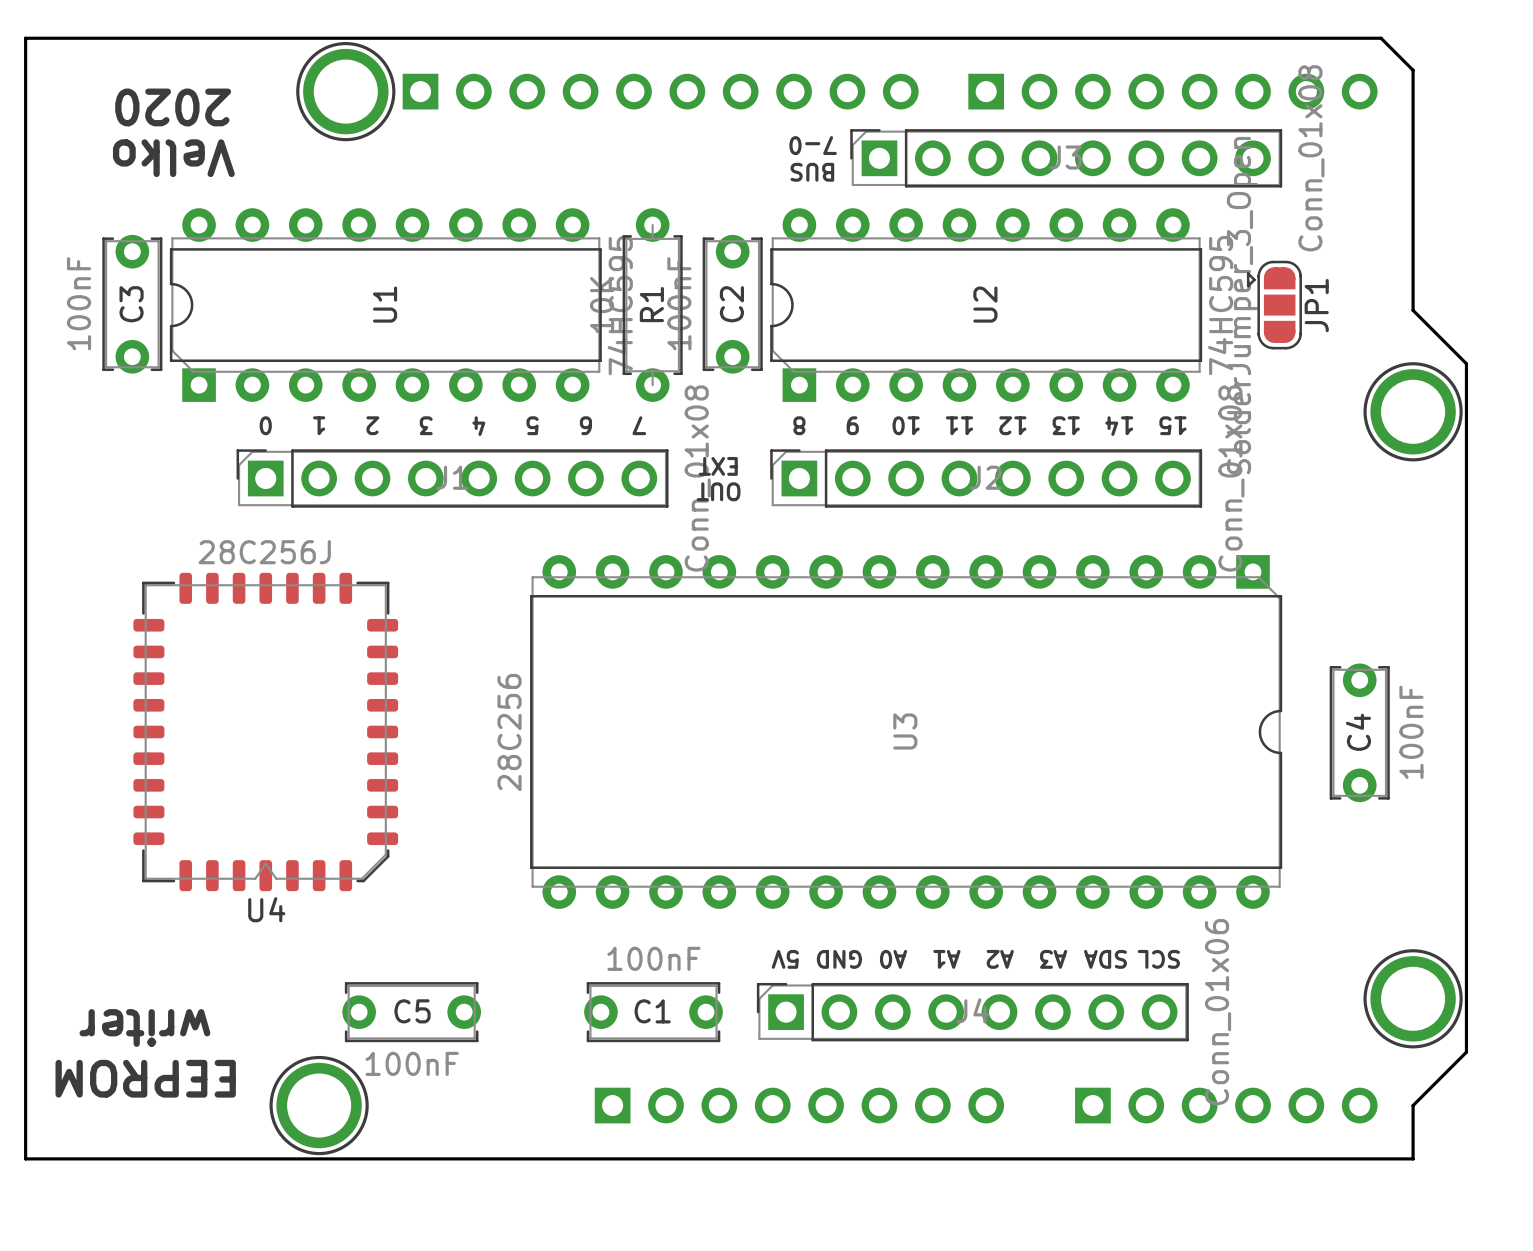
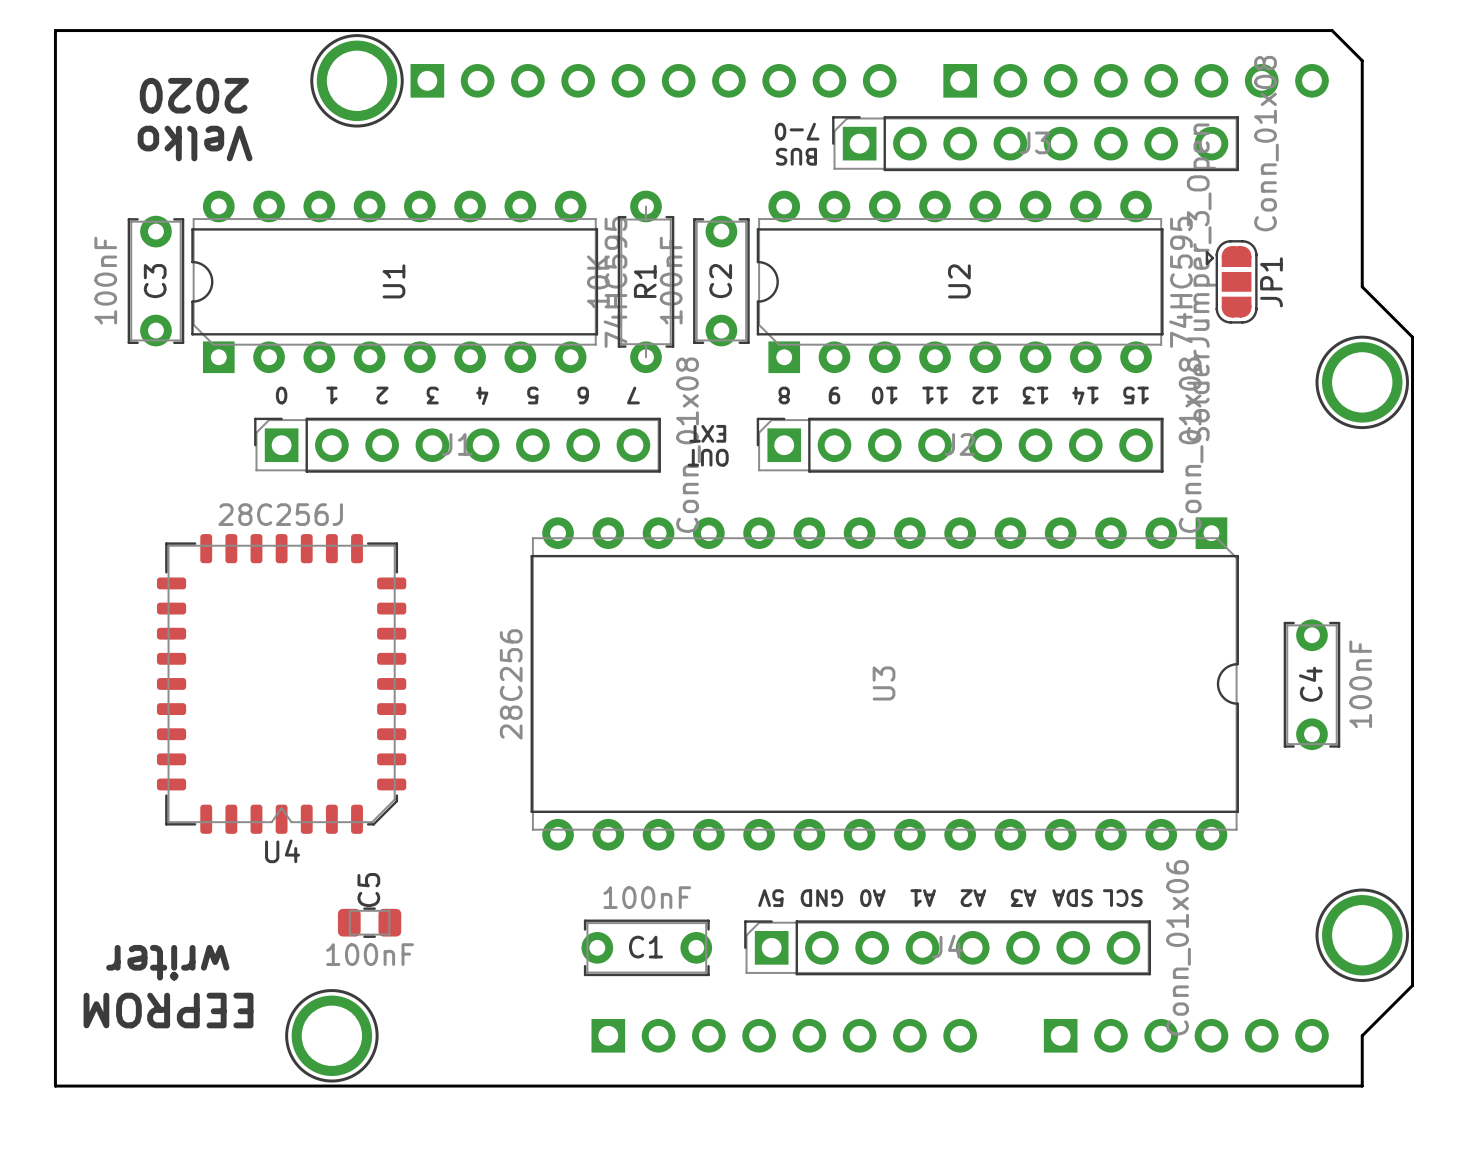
C5 footprint: [342, 982, 482, 1043] -> [337, 907, 402, 938]

